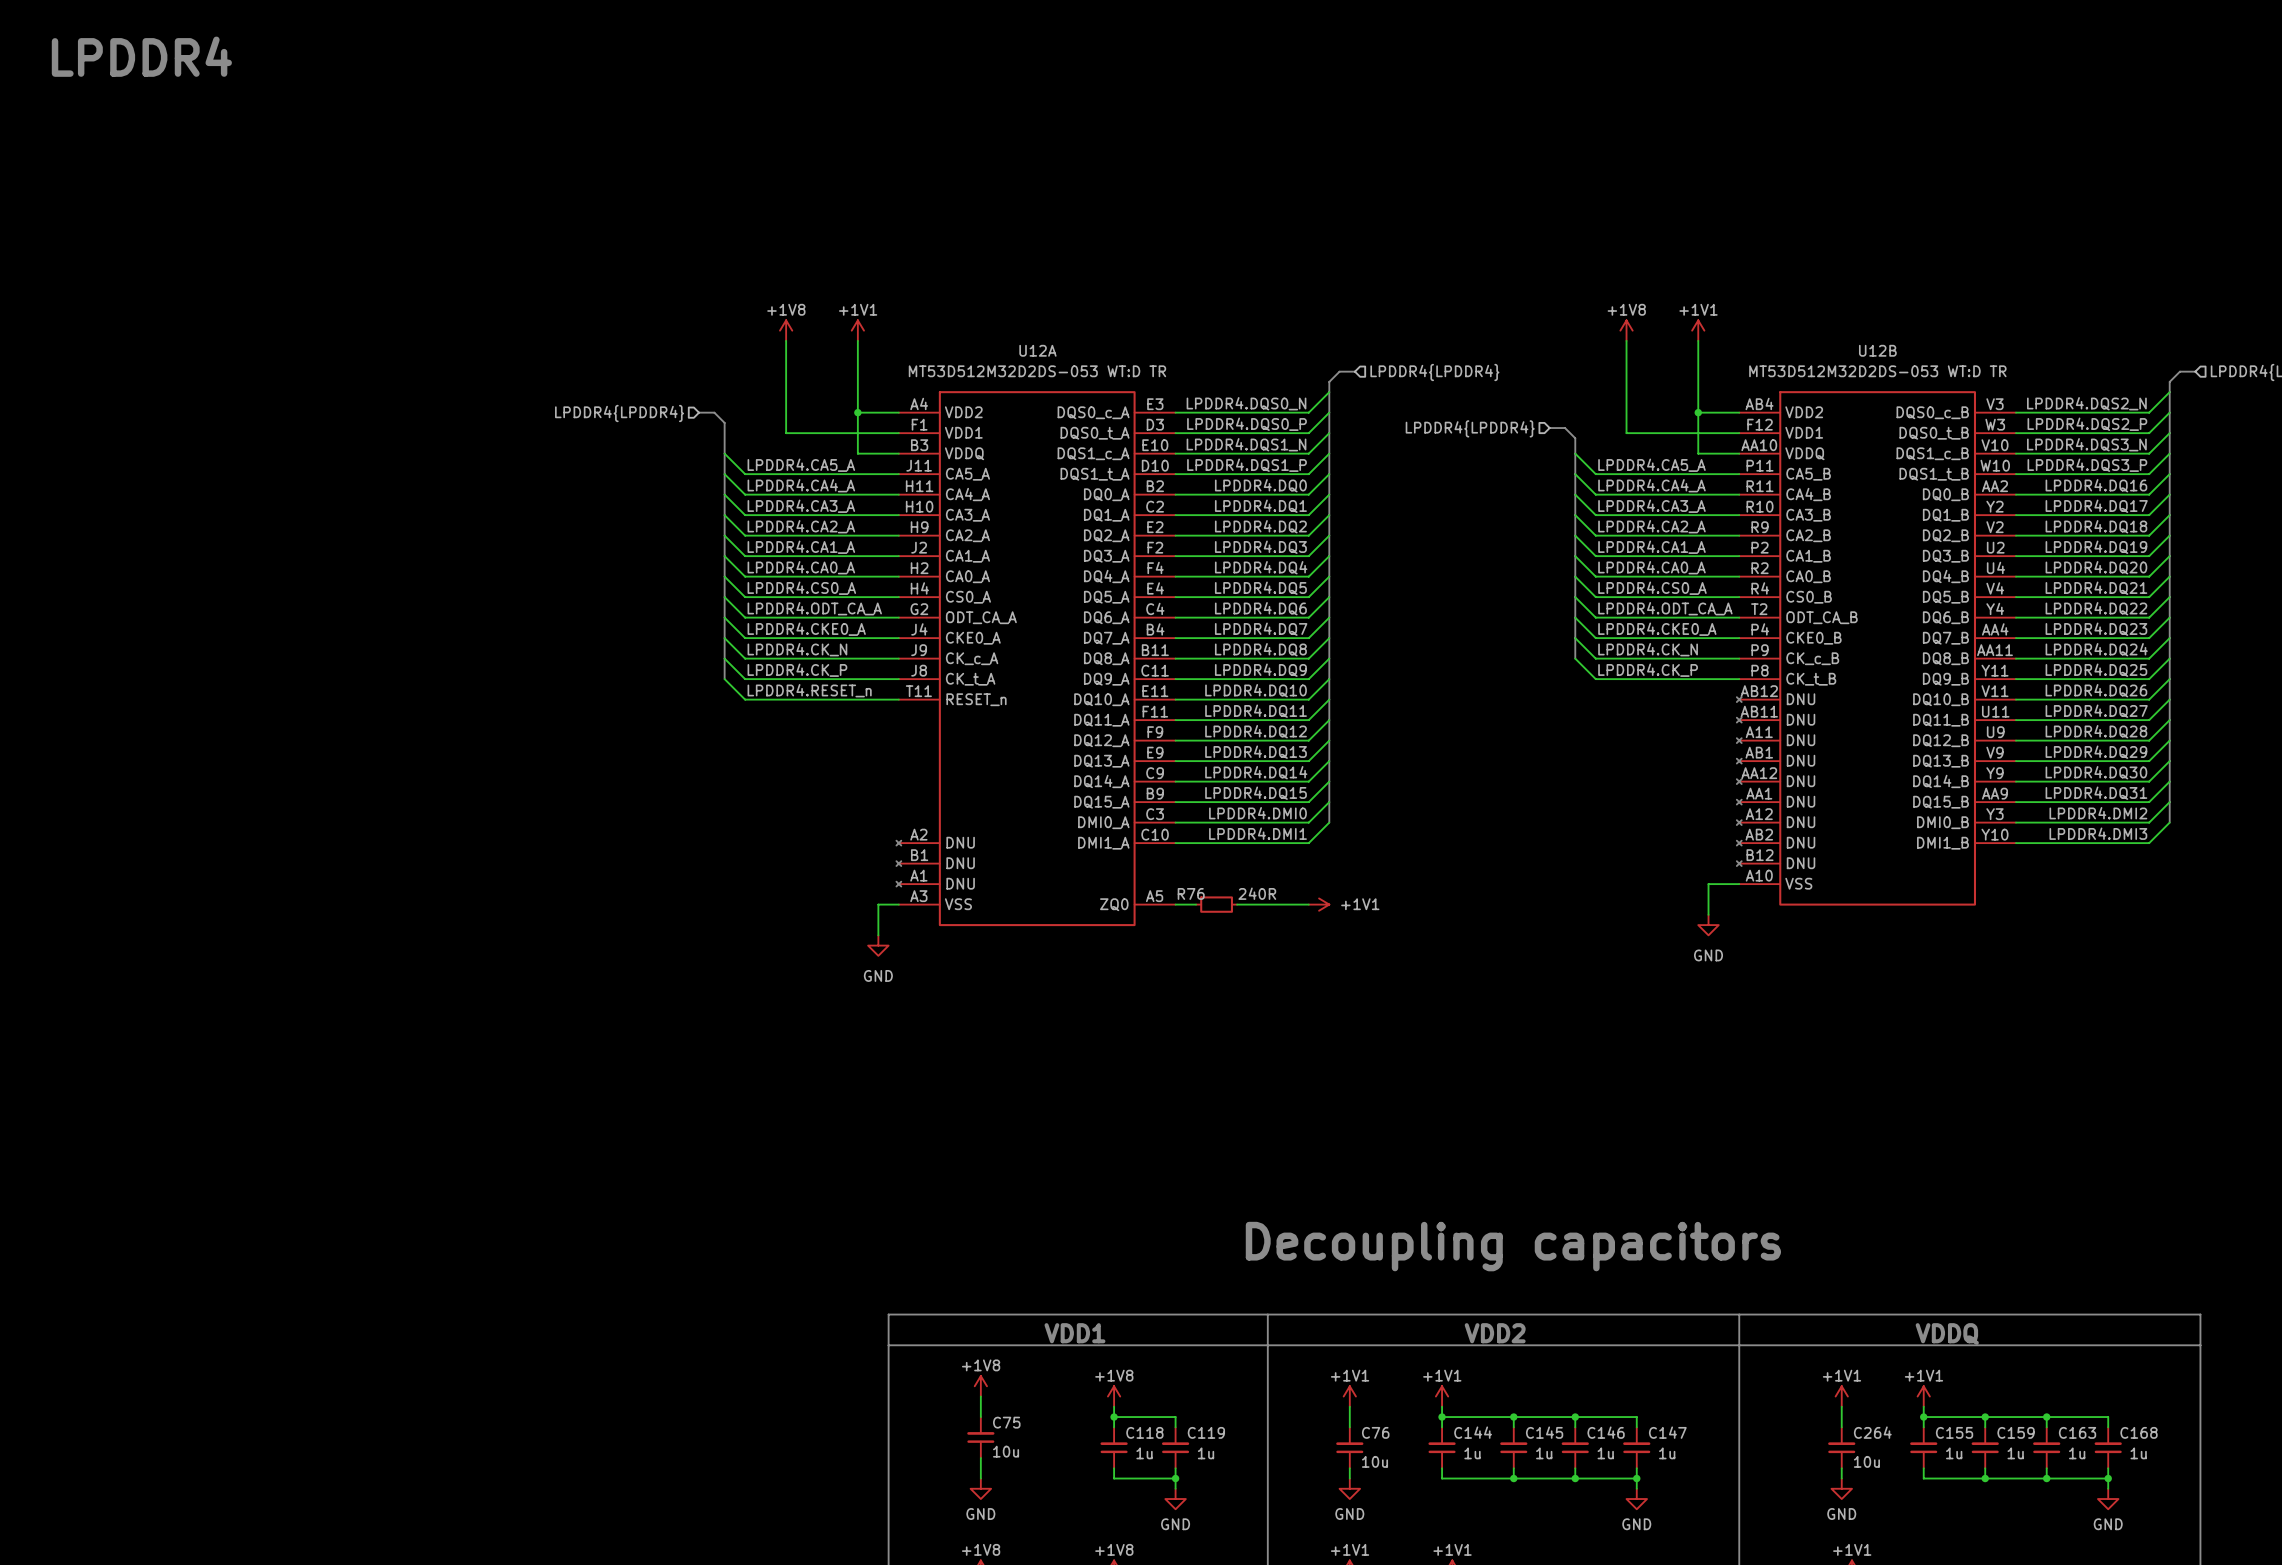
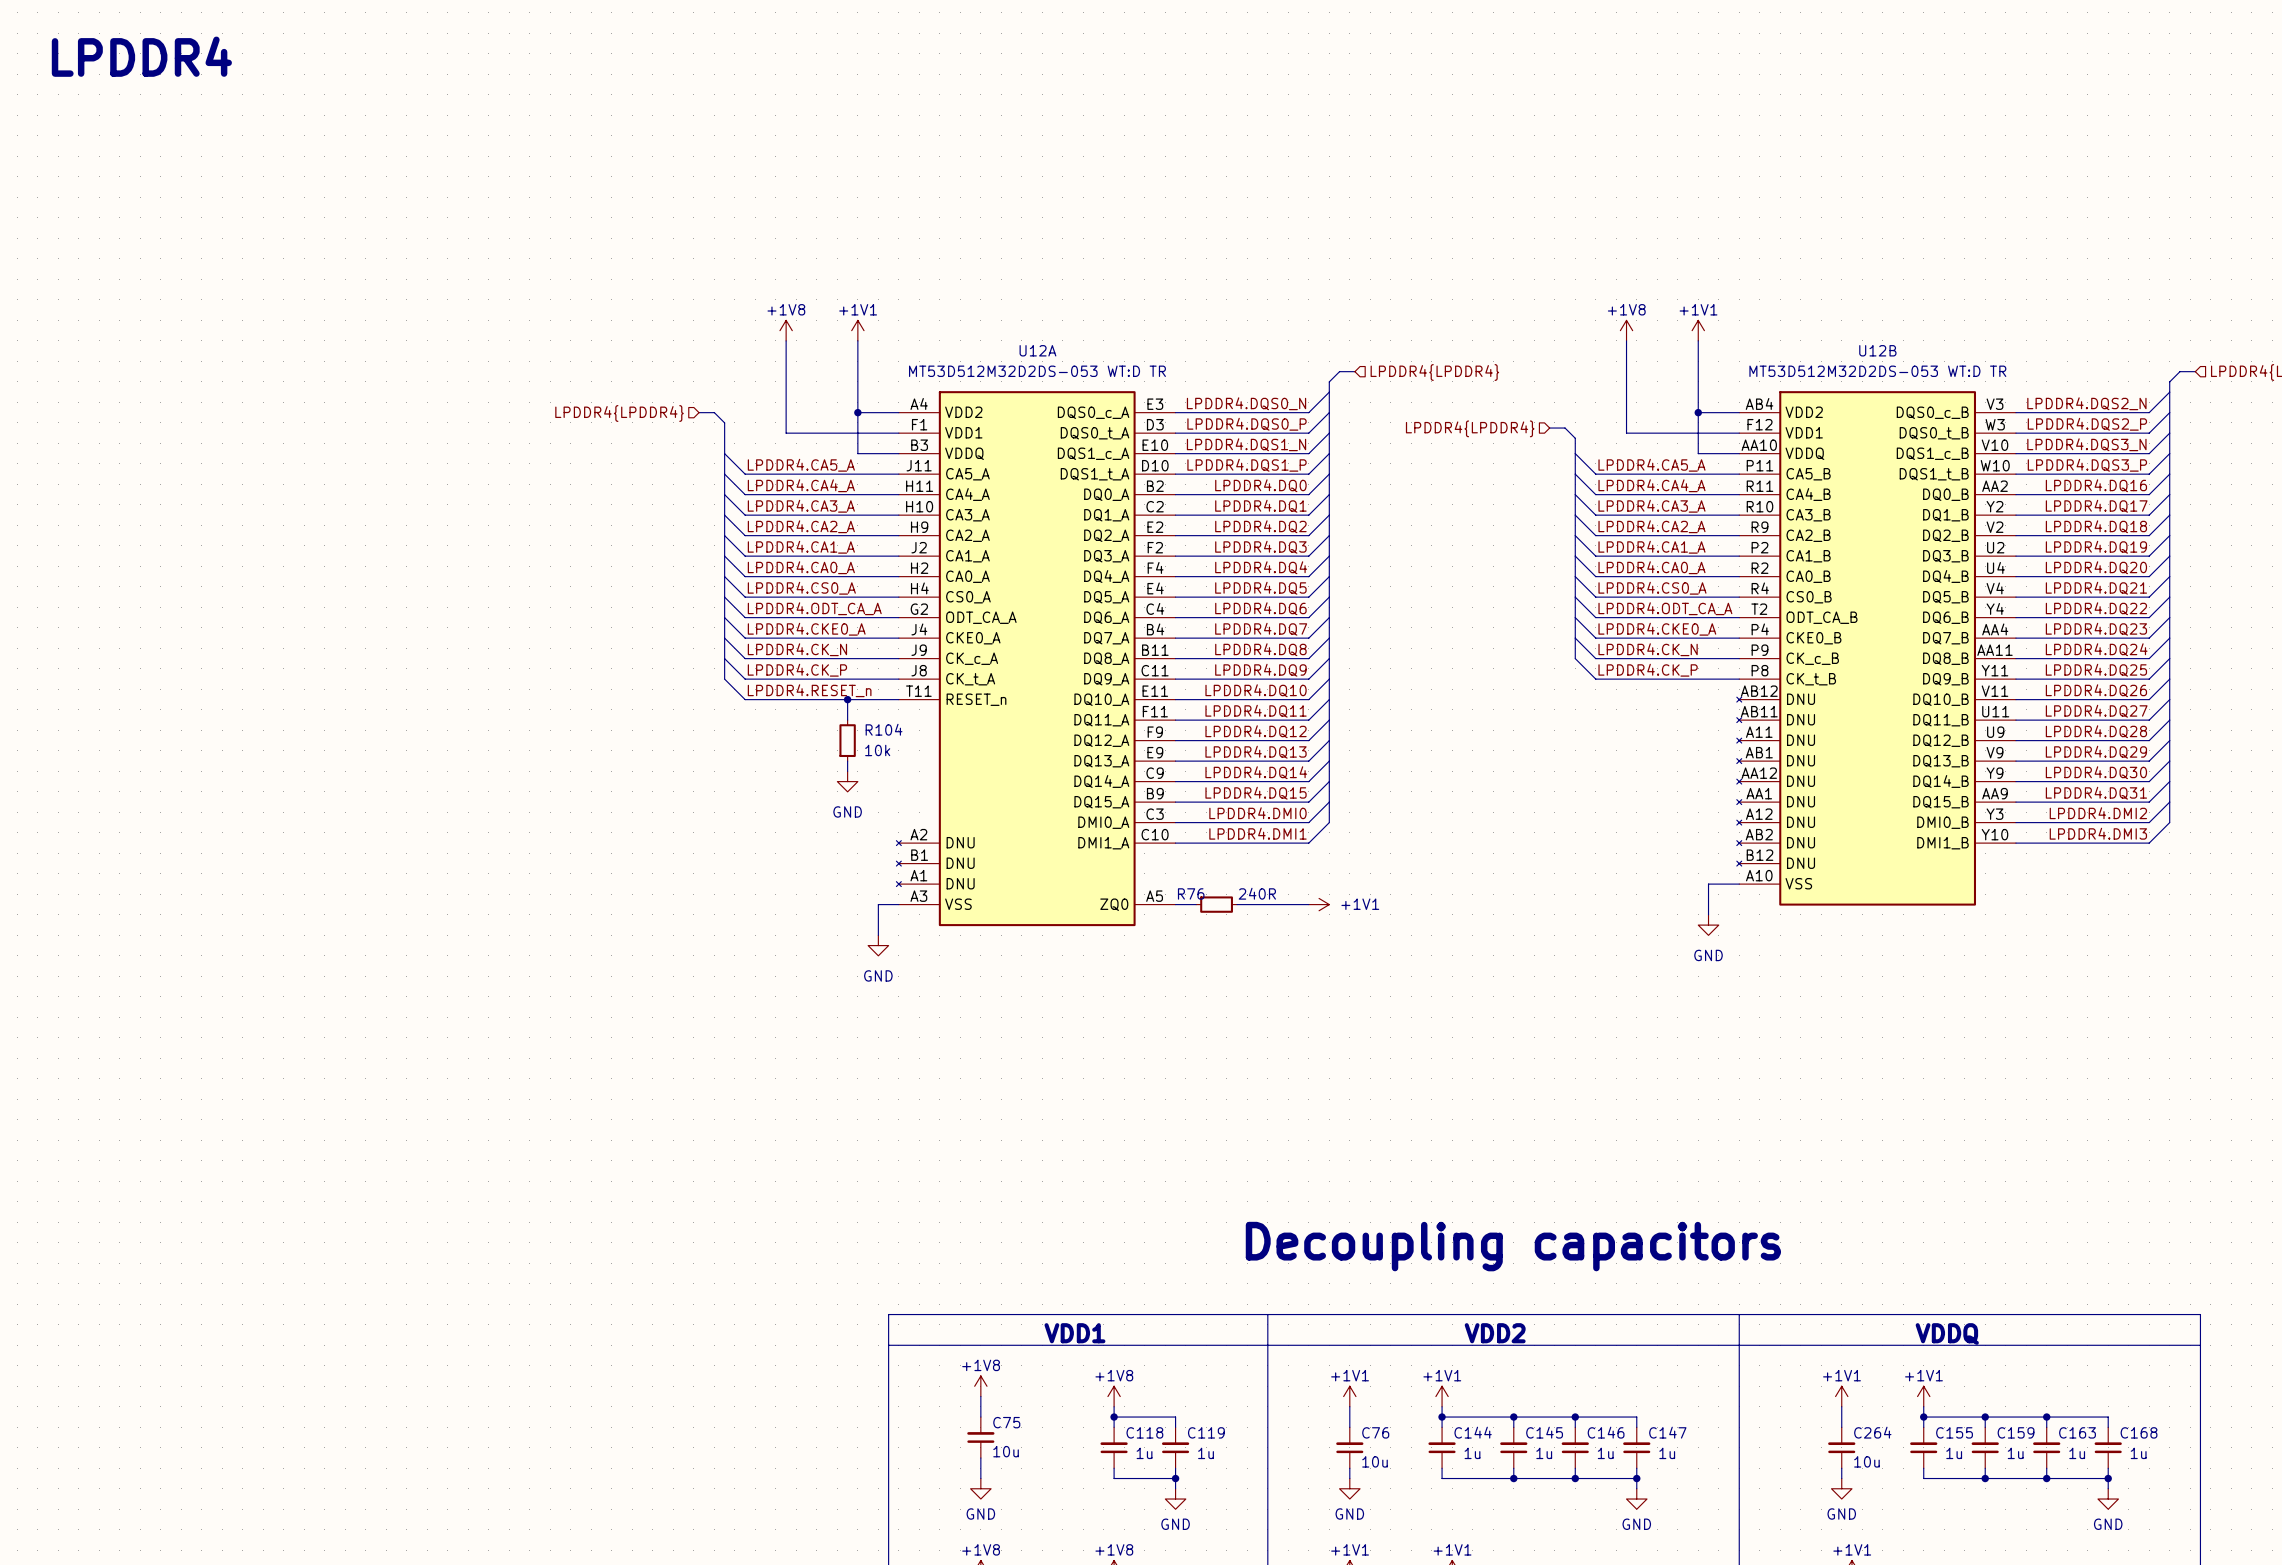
wire: none -> (847, 699) (847, 720)
junction: none -> (847, 699)
R104: none -> (847, 740)
wire: none -> (847, 761) (847, 771)
power symbol: none -> GND (847, 781)

